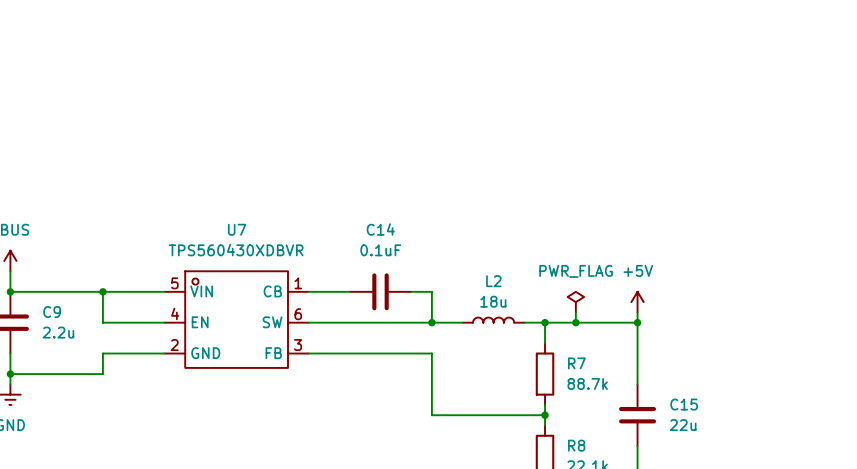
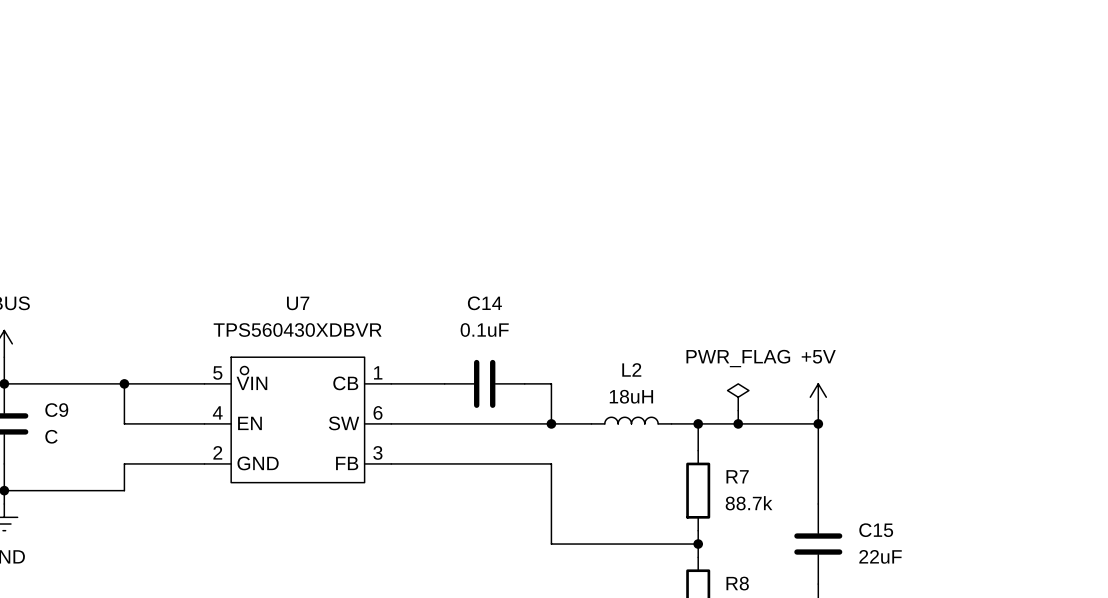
L2 value: 18u (493, 301) -> 18uH (631, 396)
C9 value: 2.2u (58, 332) -> C (51, 436)
C15 value: 22u (683, 425) -> 22uF (880, 556)

